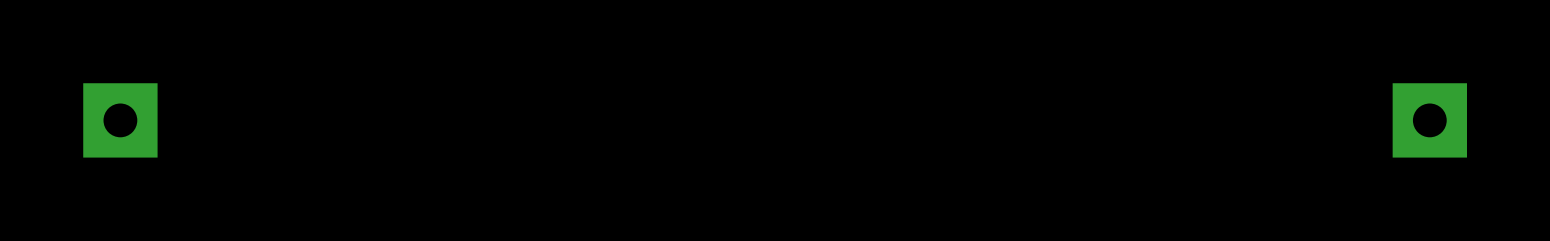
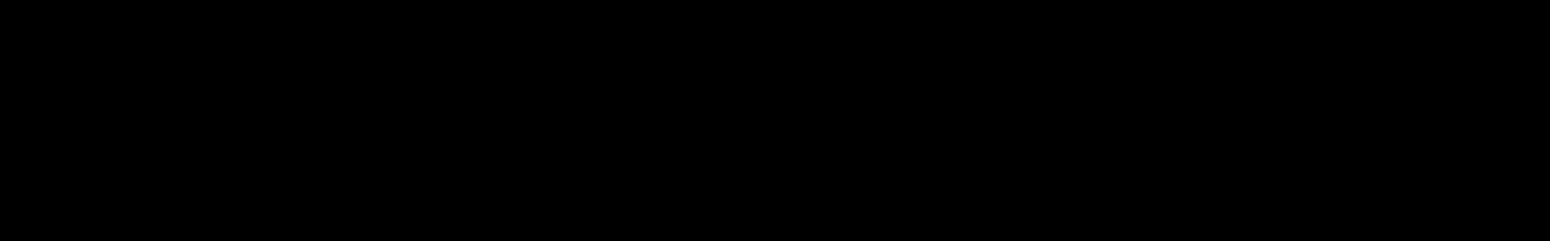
part: (120, 120) -> none
part: (1429, 120) -> none

